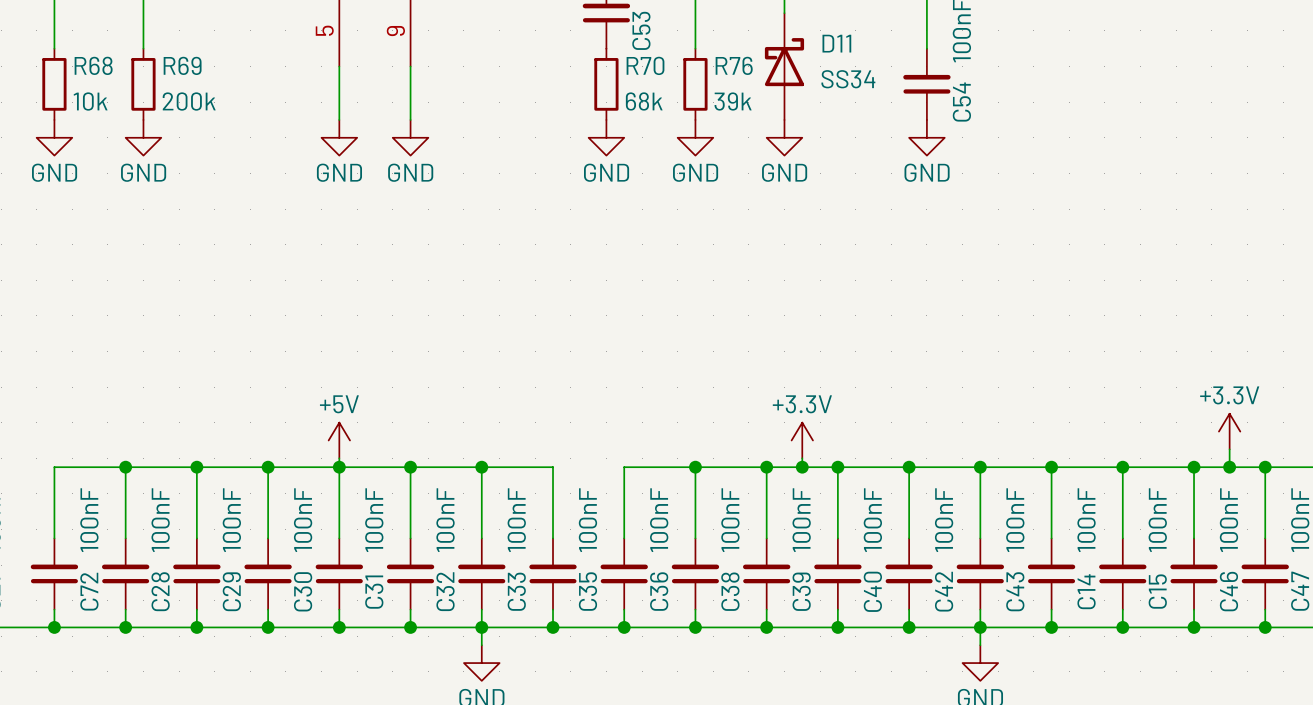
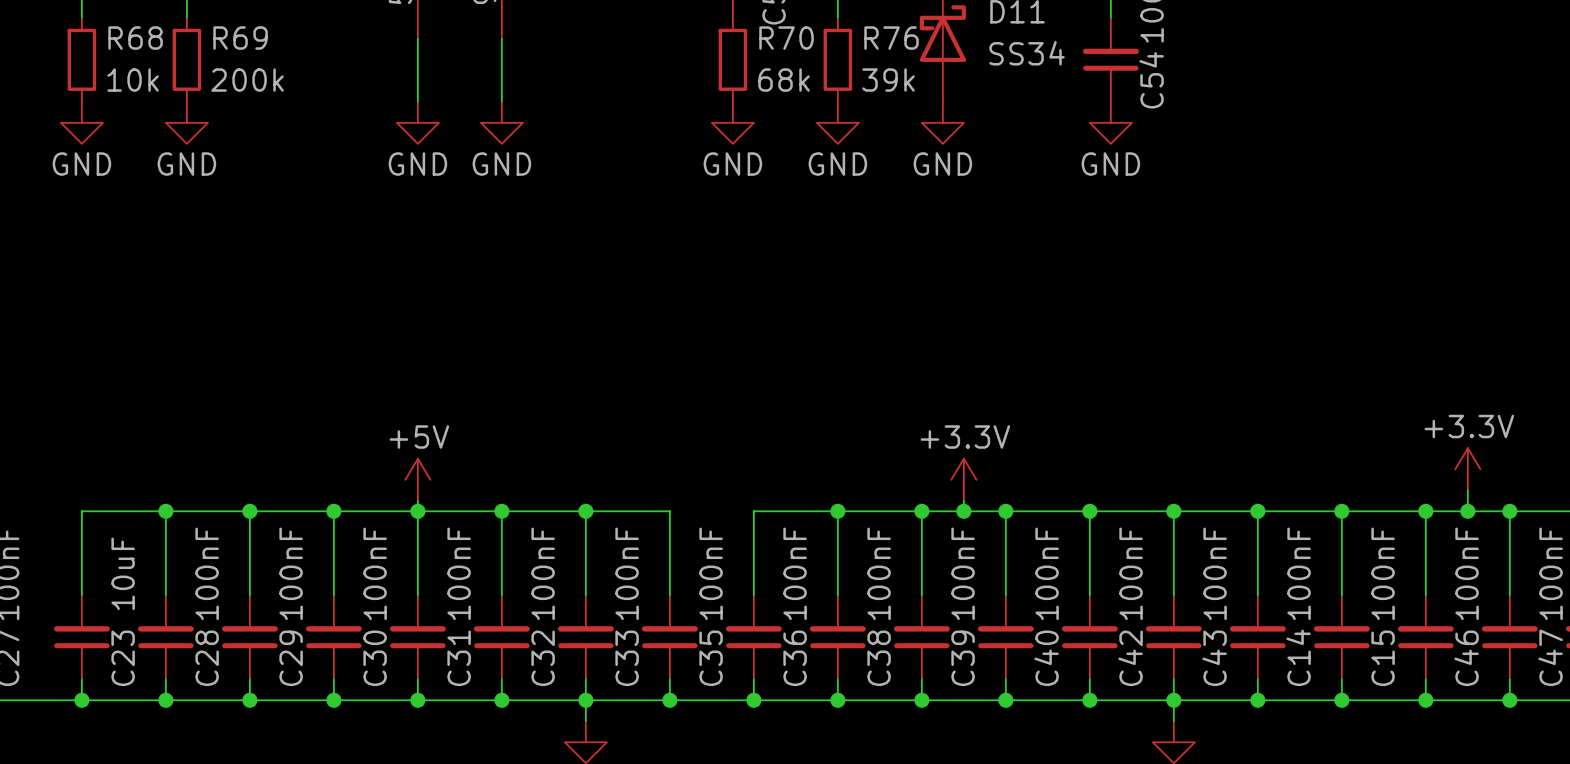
C72 value: 100nF (89, 520) -> 10uF (123, 573)
C72 name: C72 (89, 591) -> C23 (123, 658)

